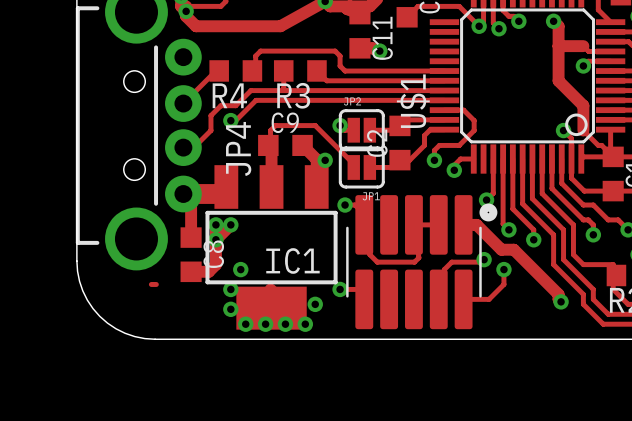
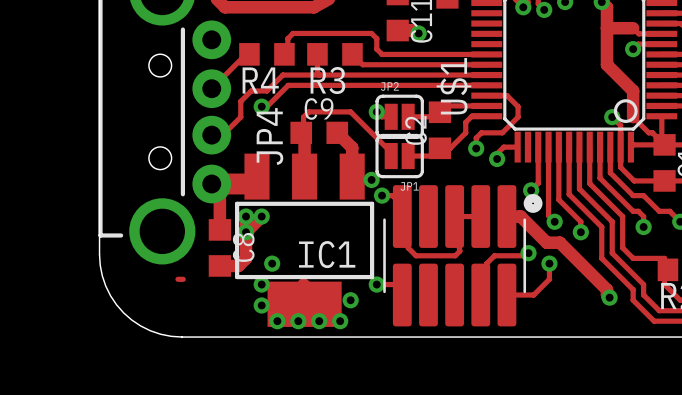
via position: (325, 160) -> (371, 179)

